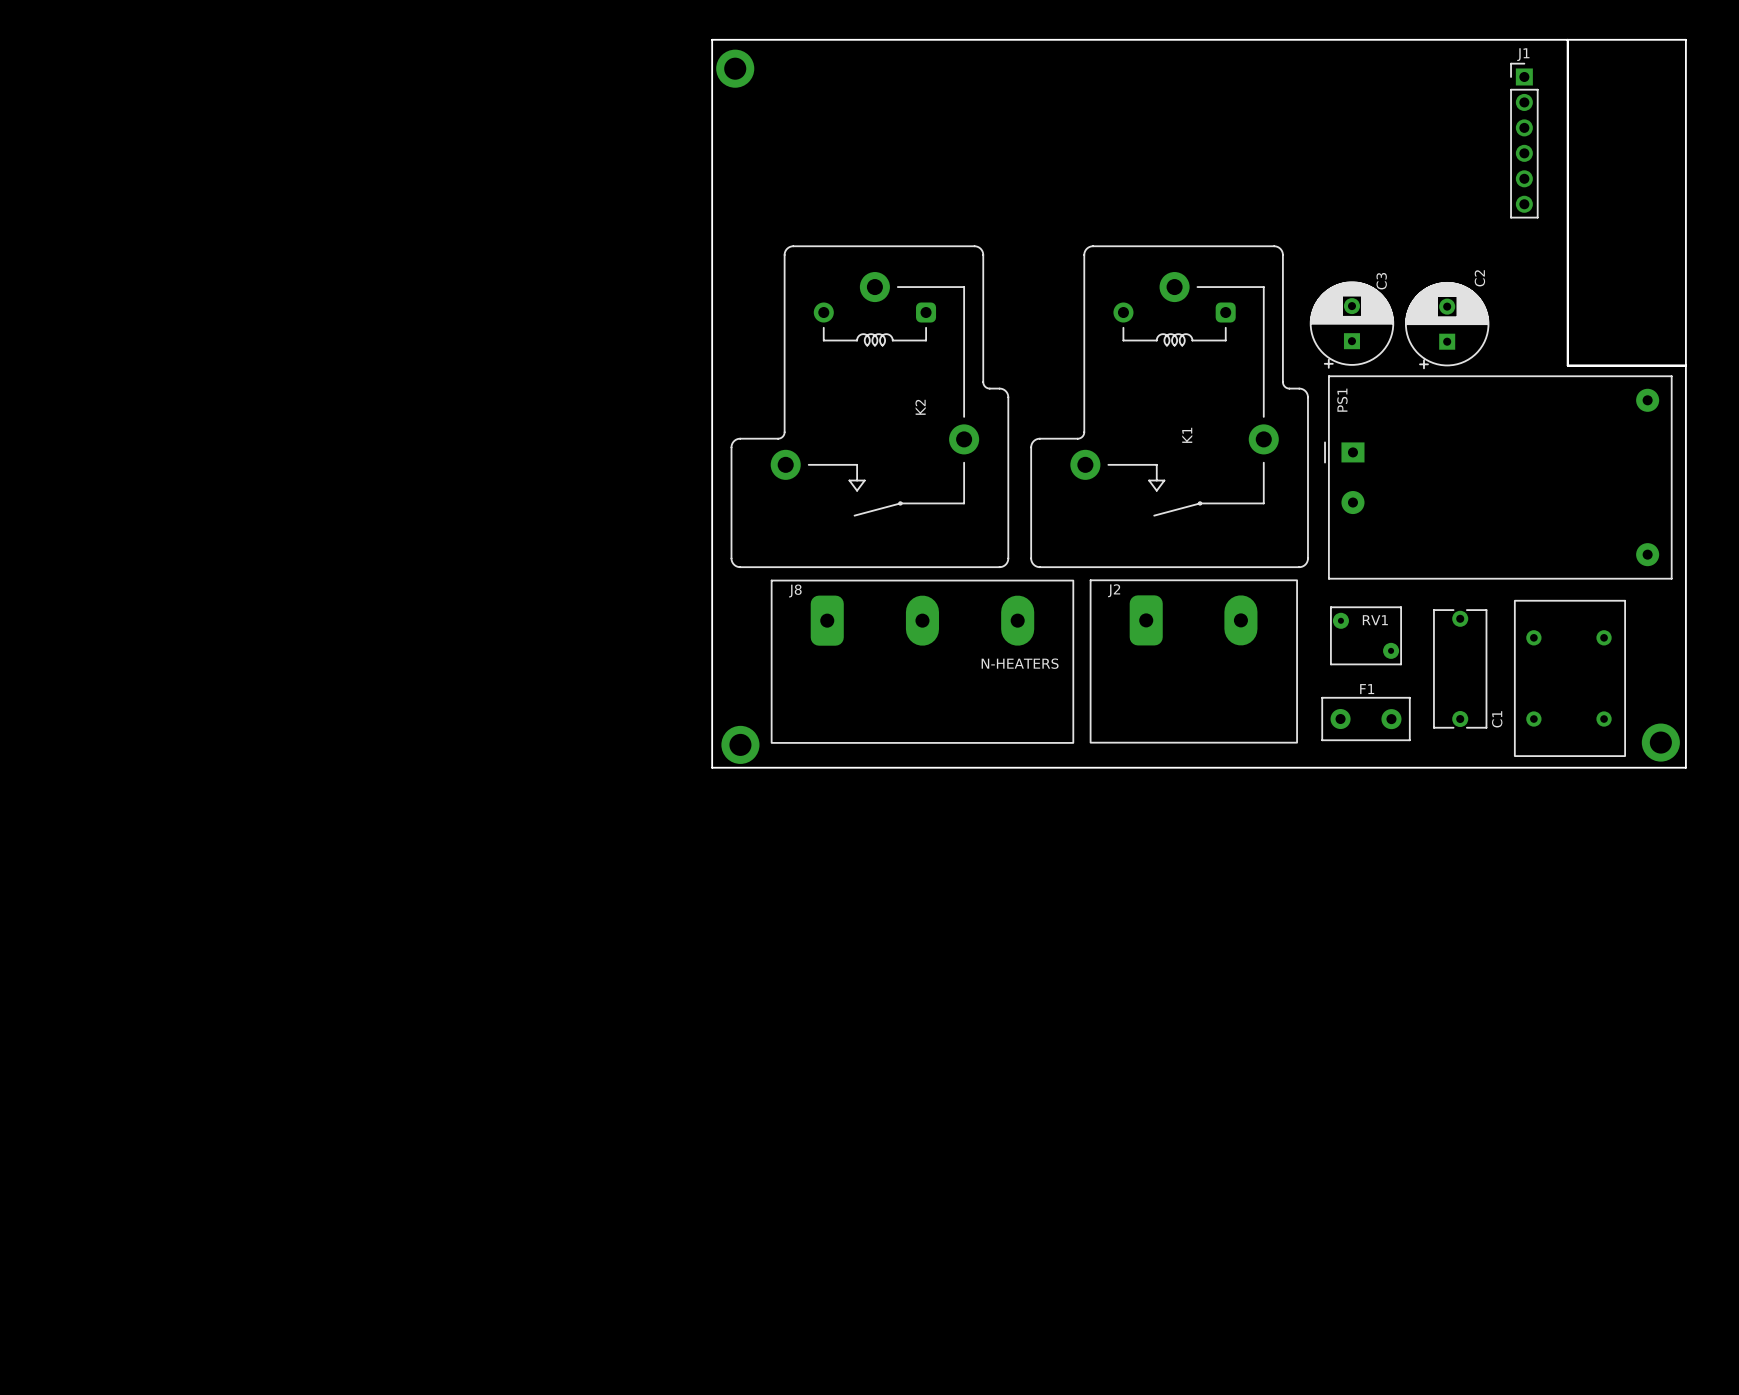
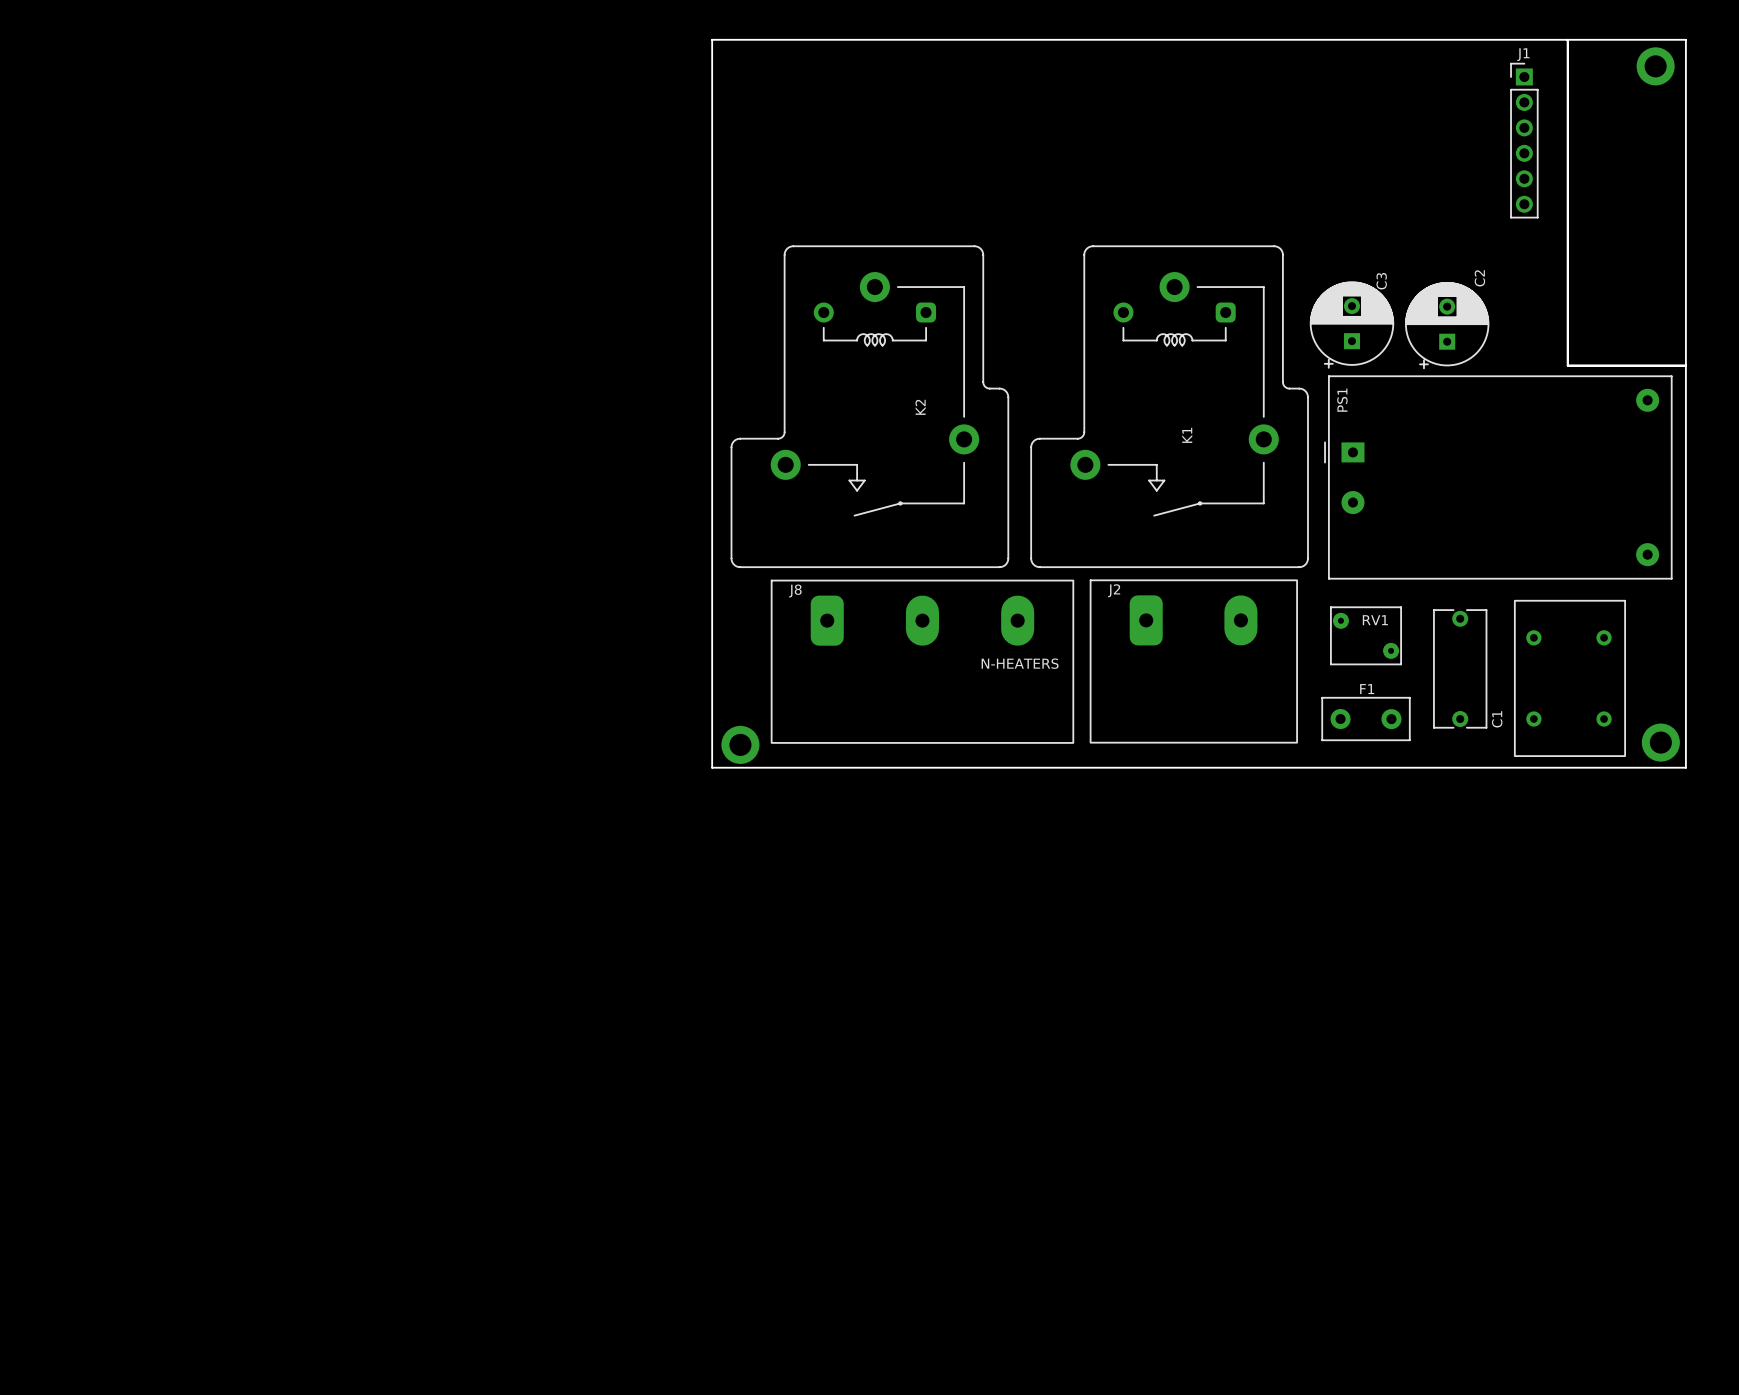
part: none -> (1655, 66)
part: (735, 68) -> none

